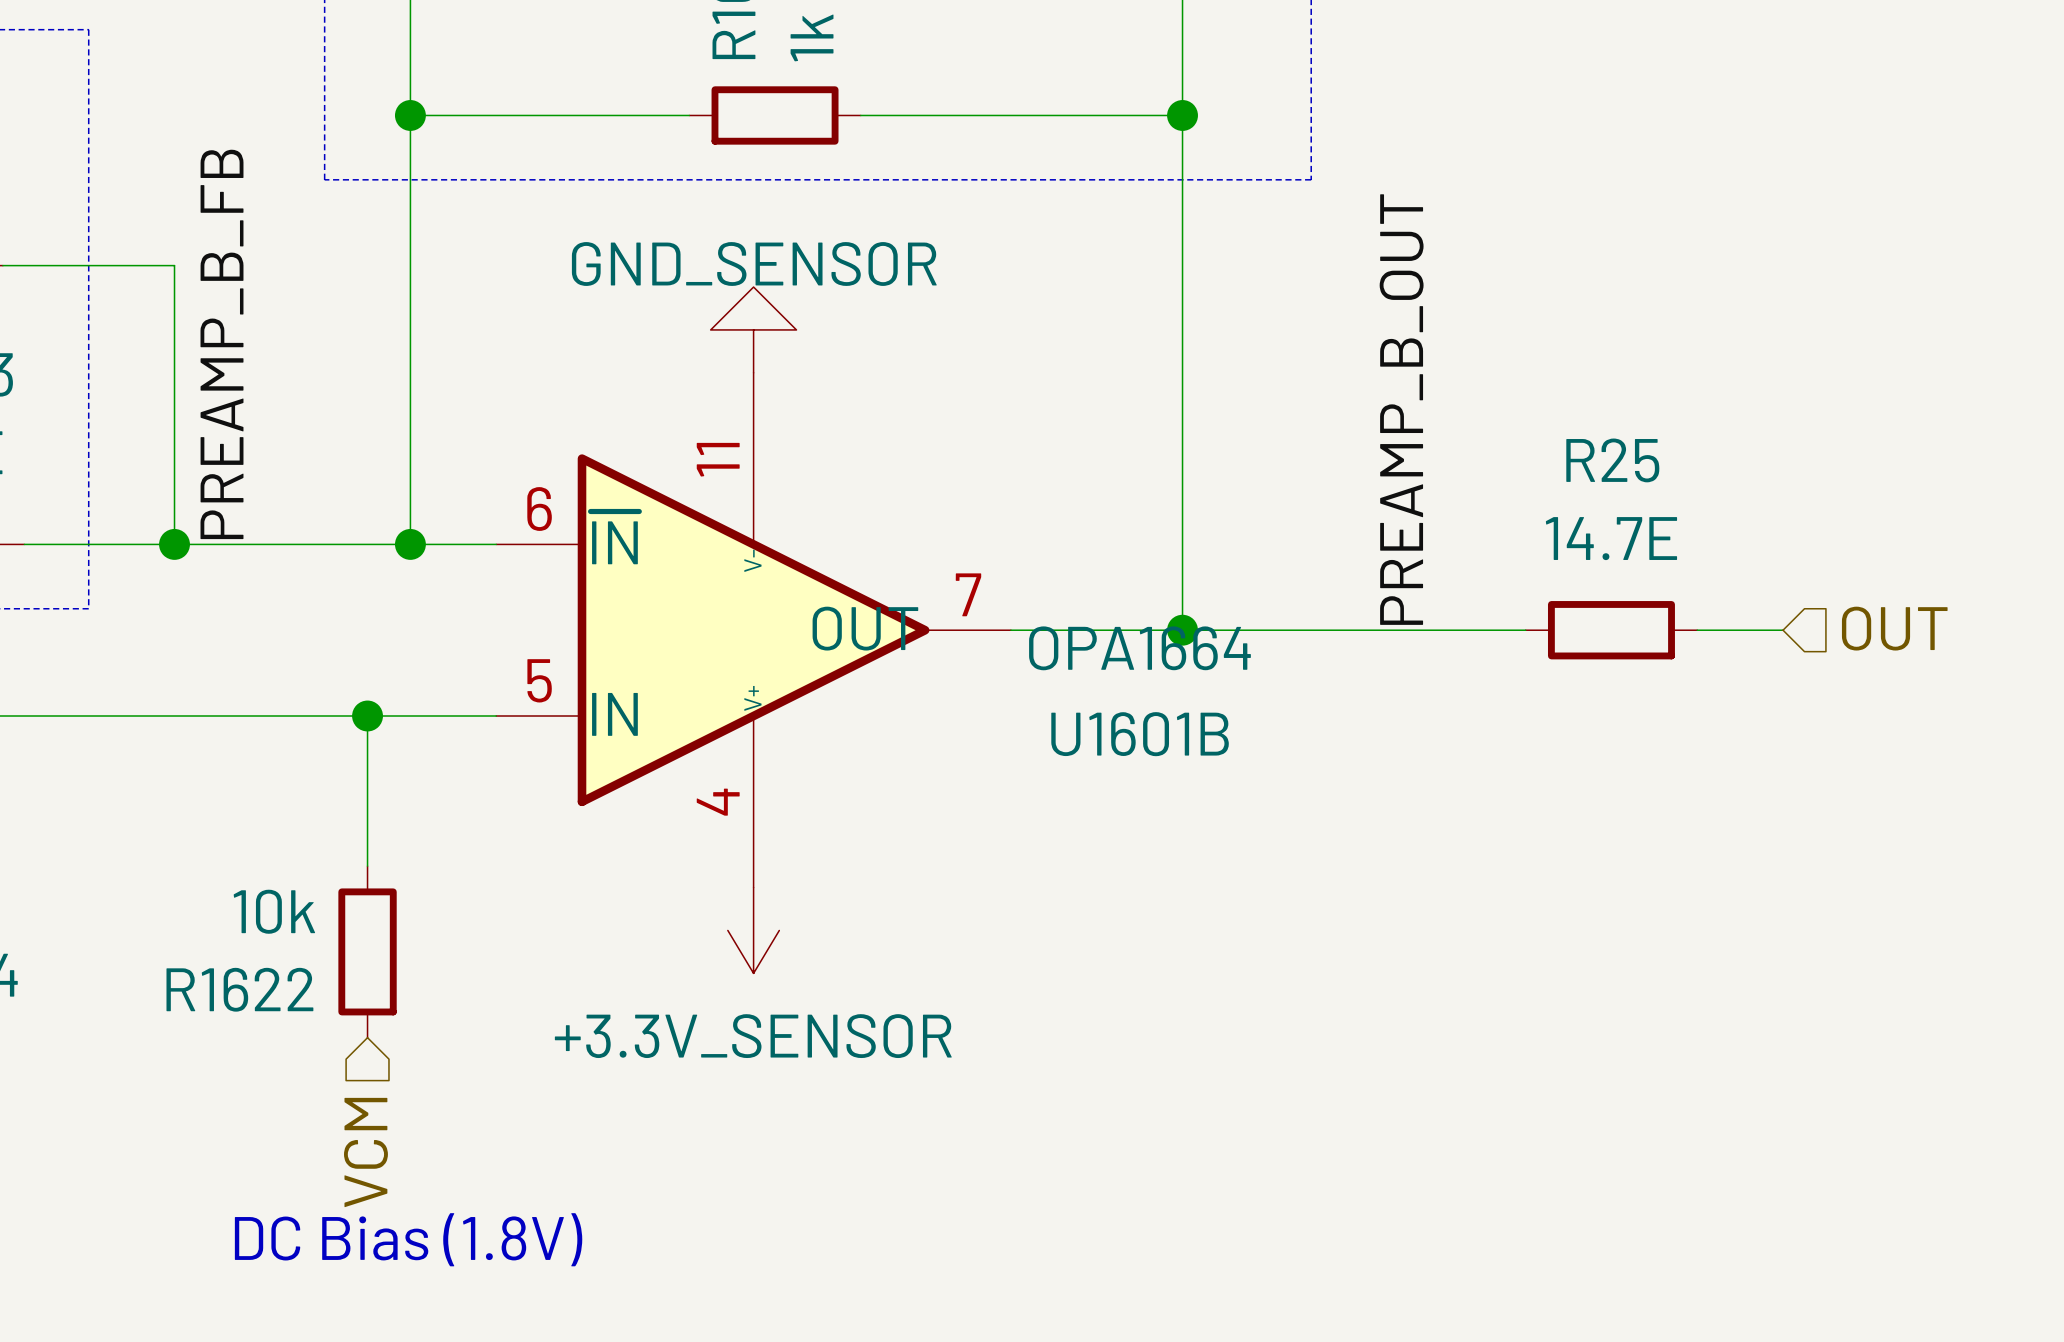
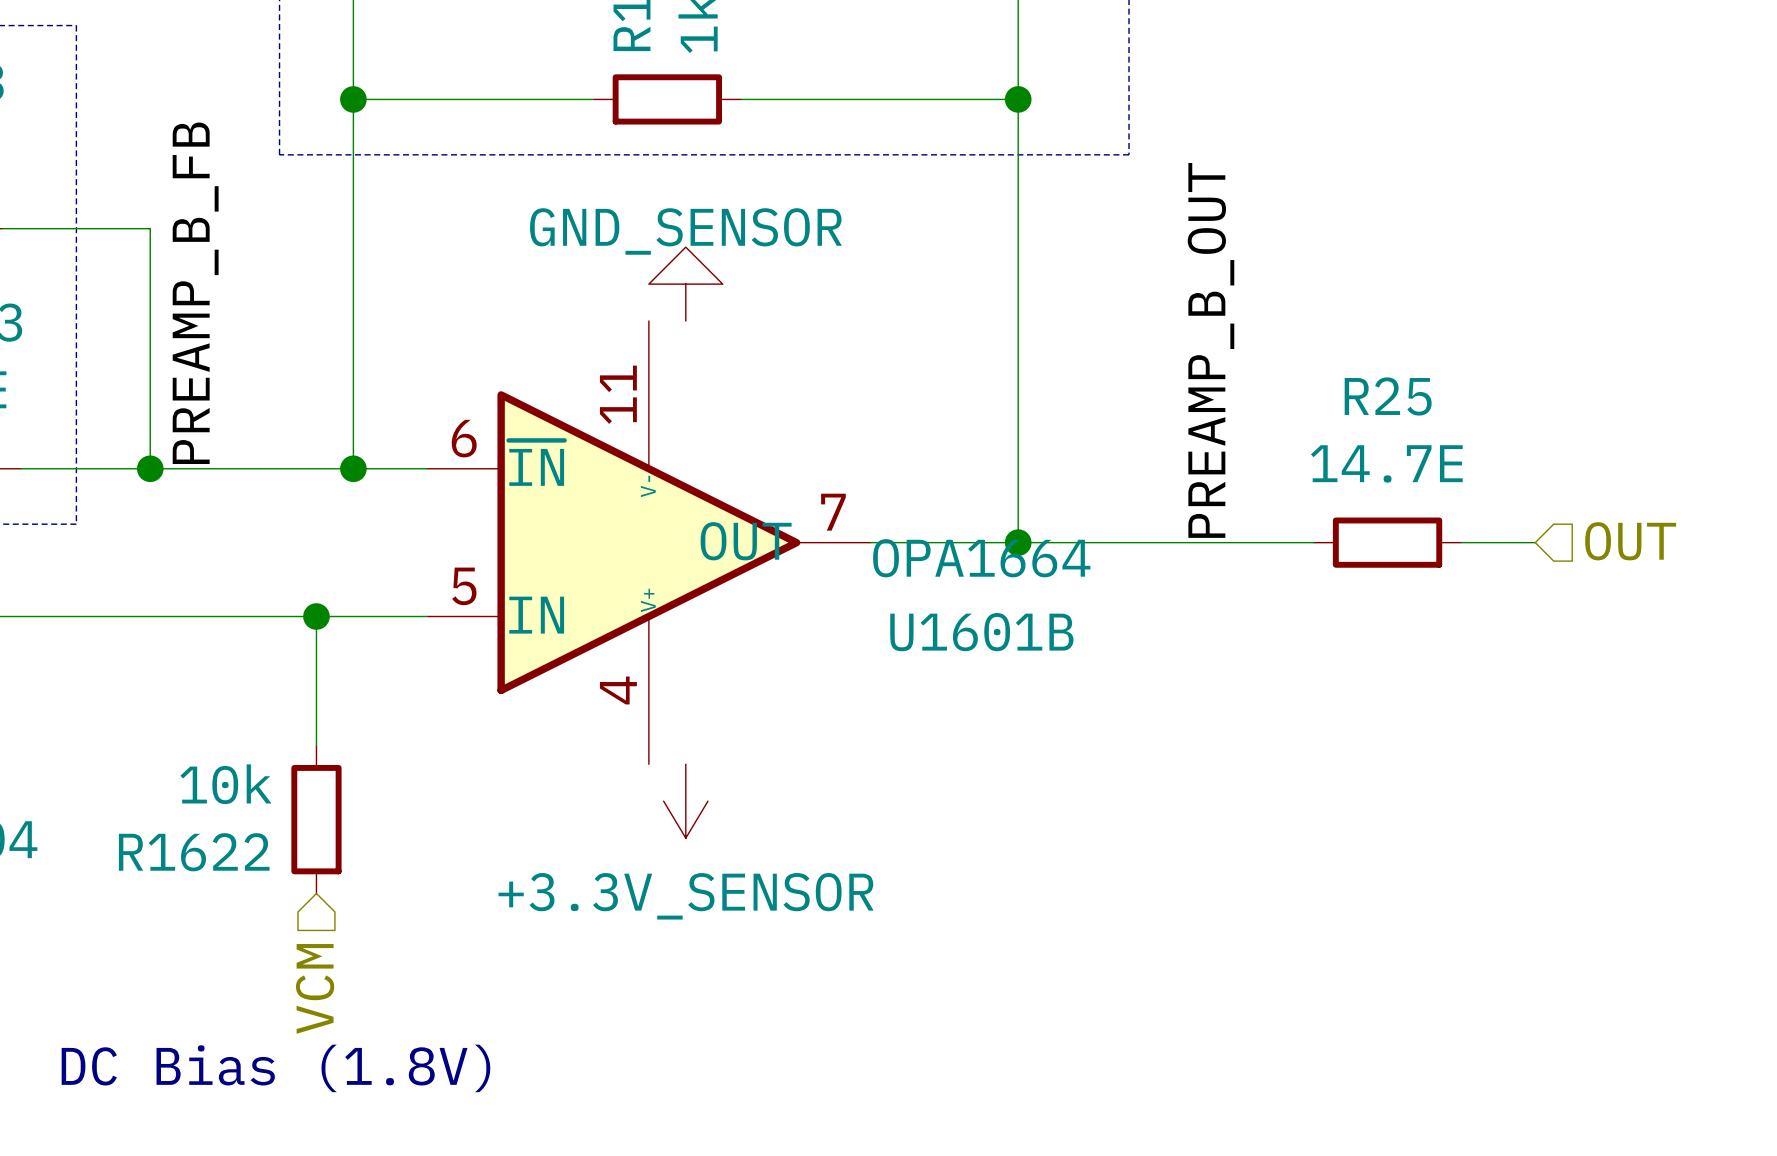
power symbol position: GND_SENSOR (753, 329) -> GND_SENSOR (685, 284)
power symbol position: +3.3V_SENSOR (753, 930) -> +3.3V_SENSOR (685, 801)

